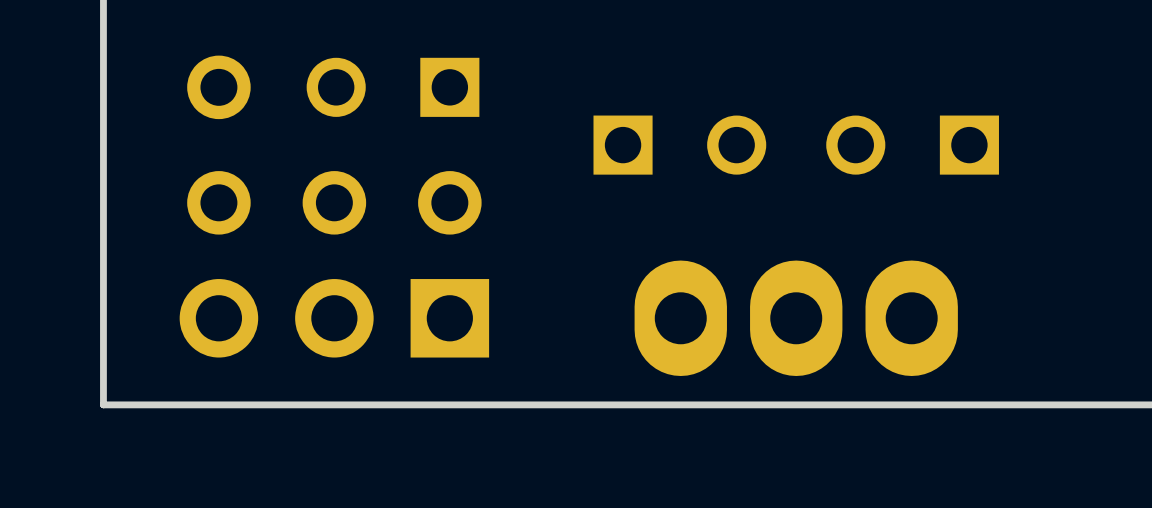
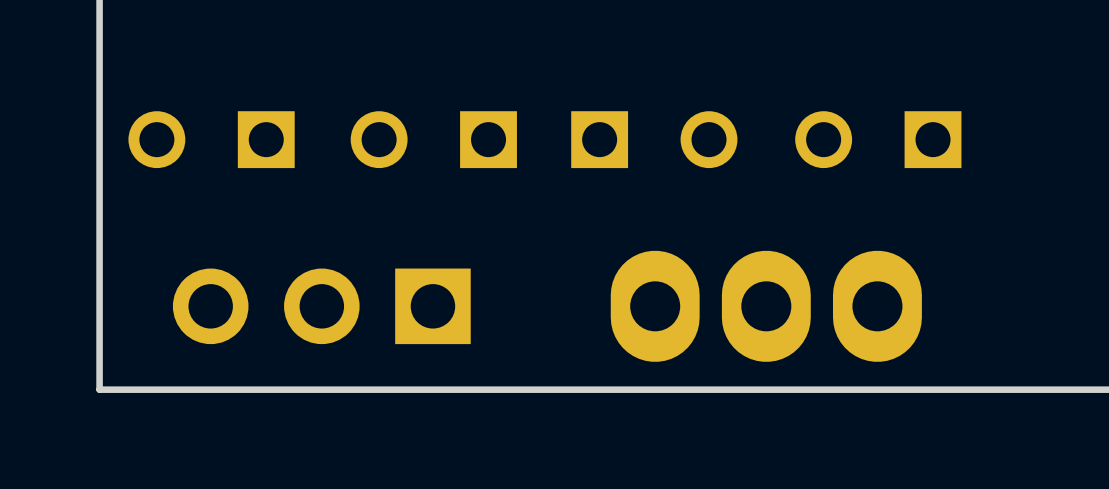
part footprint: [187, 55, 251, 235] -> [128, 111, 295, 169]
part position: (393, 87) -> (433, 139)
part: (392, 202) -> none

